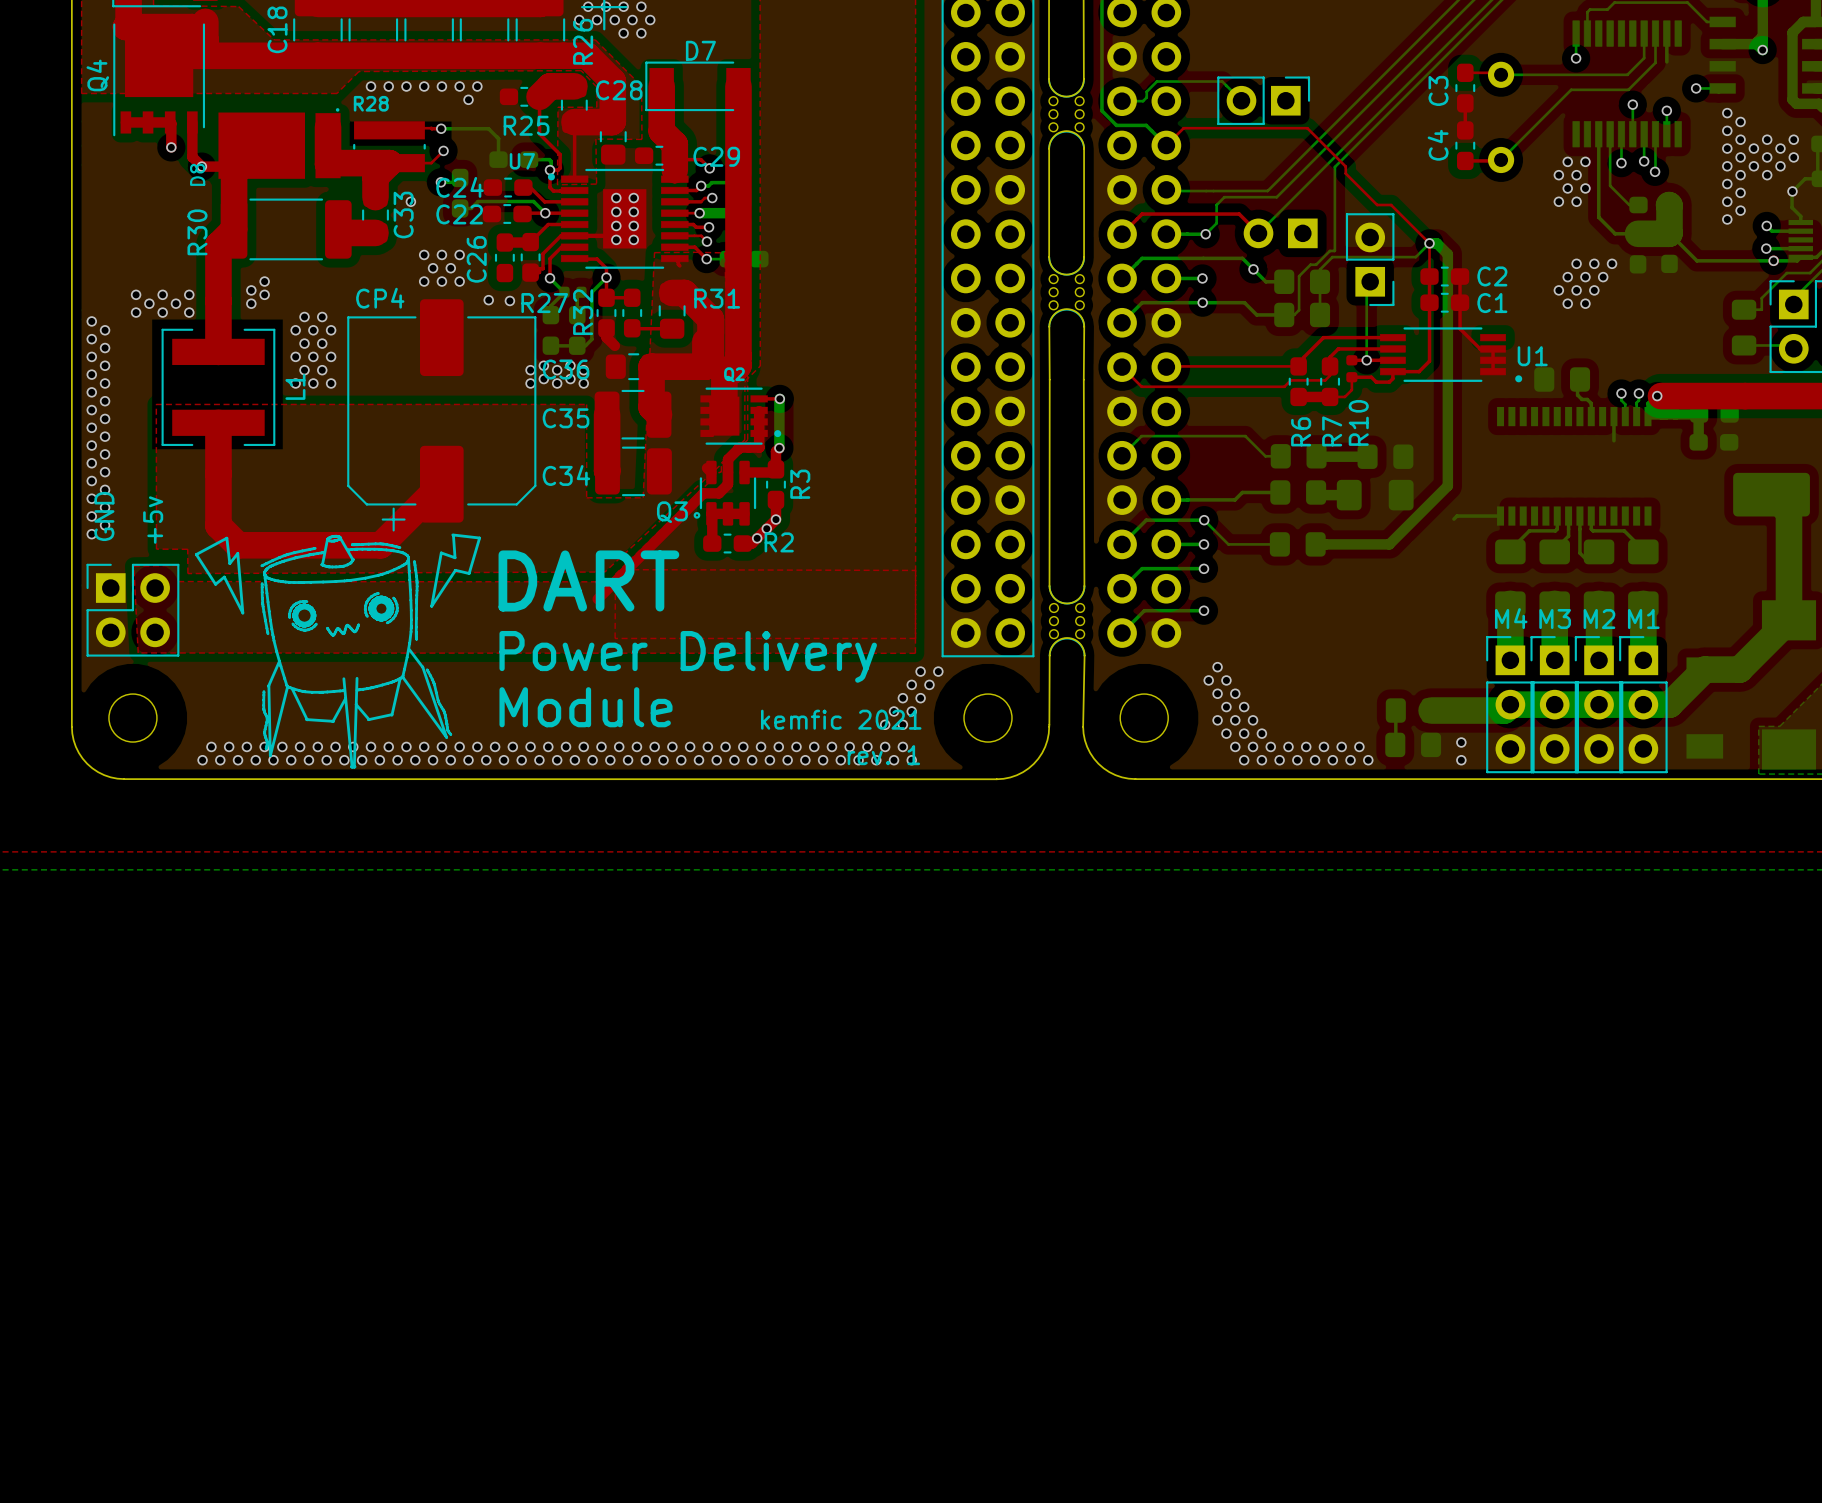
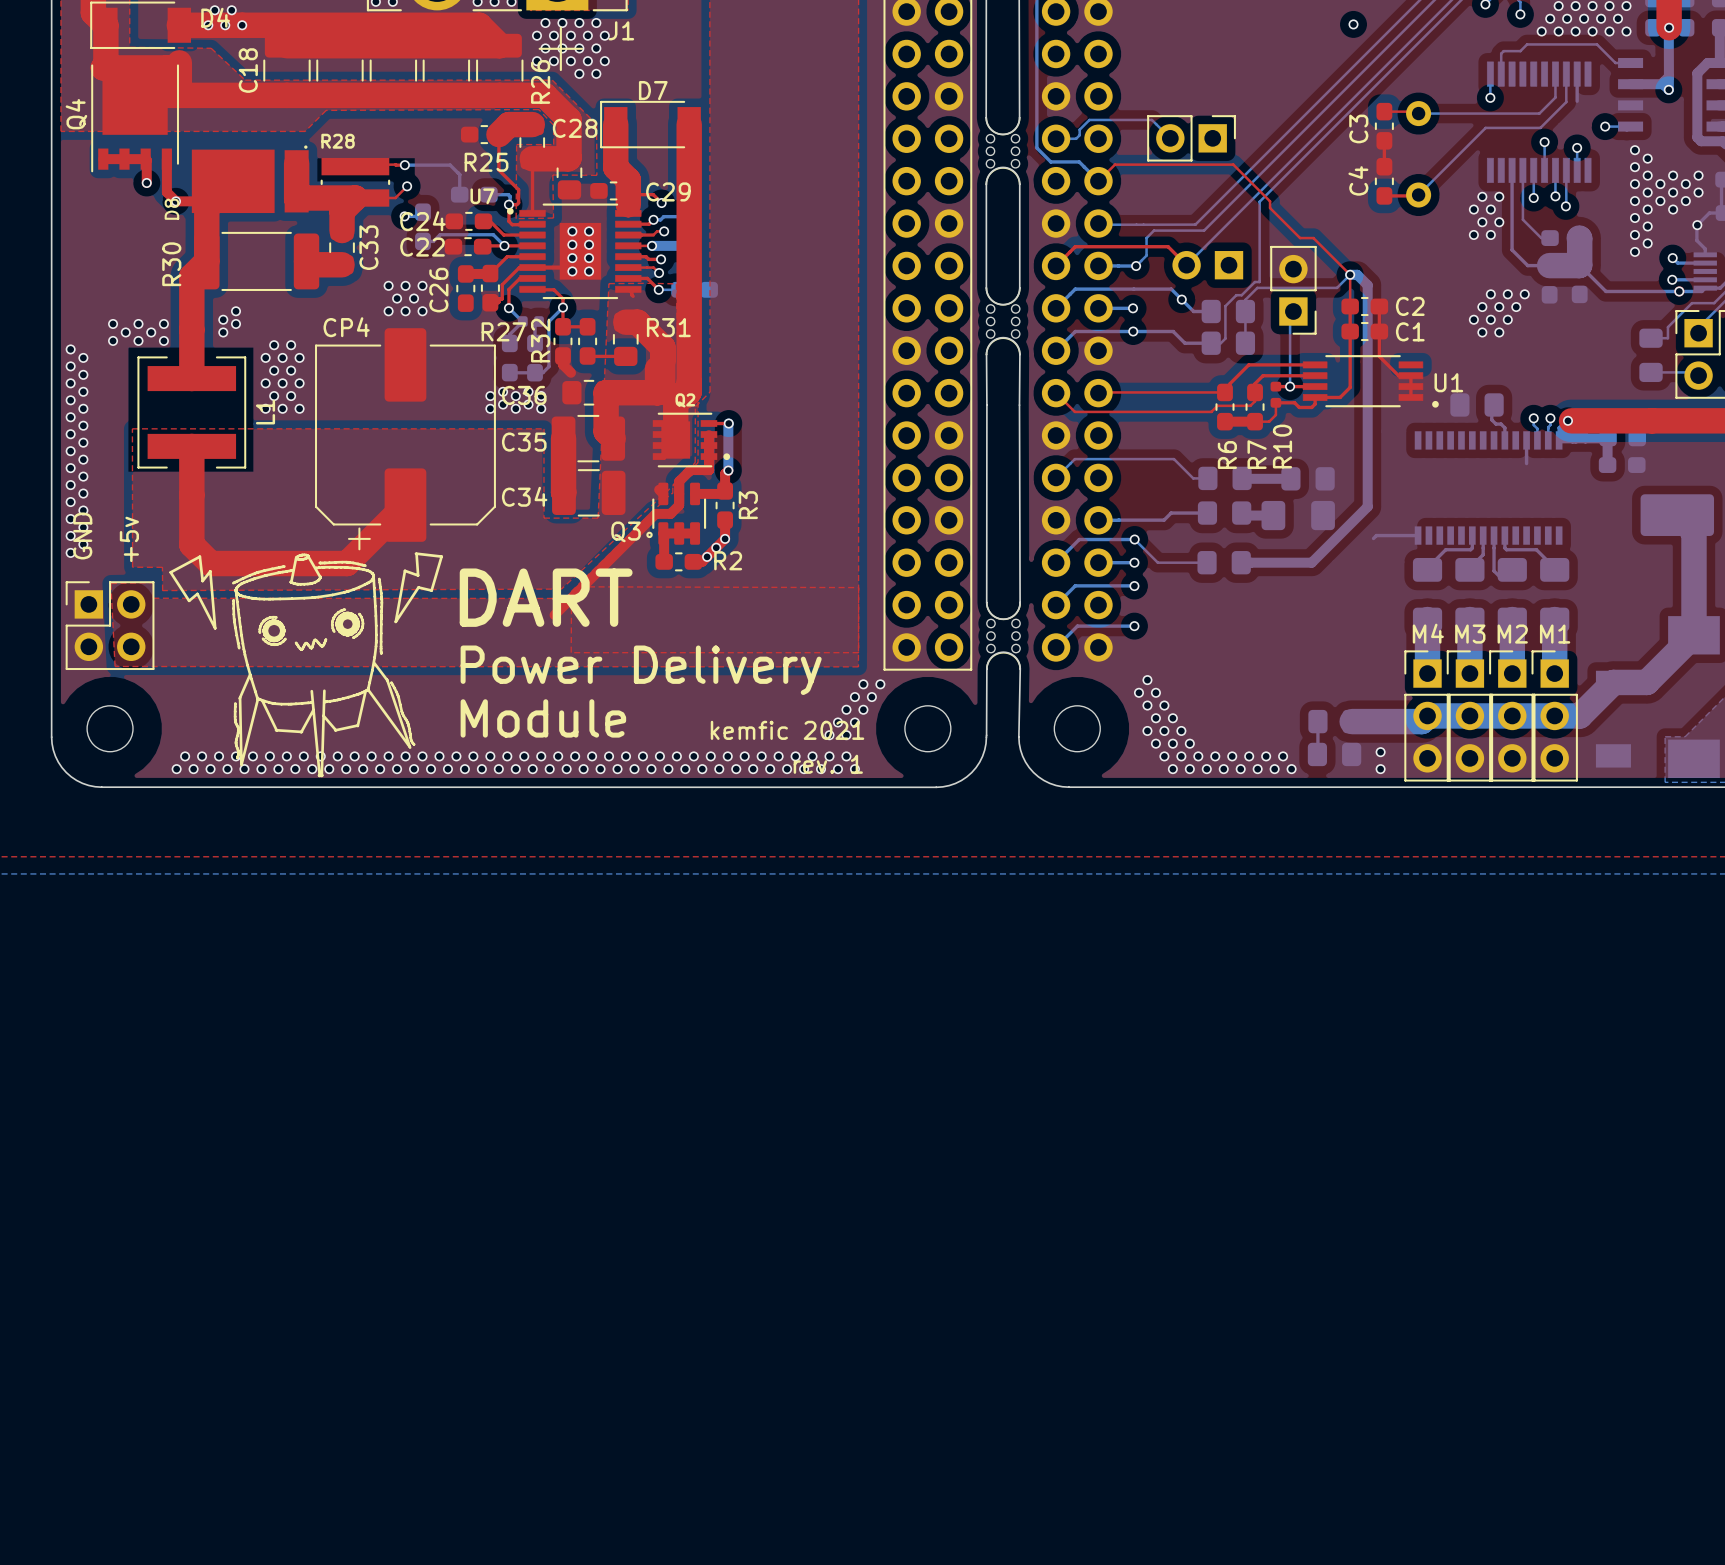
via: (371, 86) -> none
via: (388, 86) -> none
via: (406, 86) -> none
via: (424, 86) -> none
via: (441, 86) -> none
via: (459, 86) -> none
via: (477, 86) -> none
via: (468, 99) -> none
via: (410, 201) -> none
via: (488, 300) -> none
via: (509, 300) -> none

